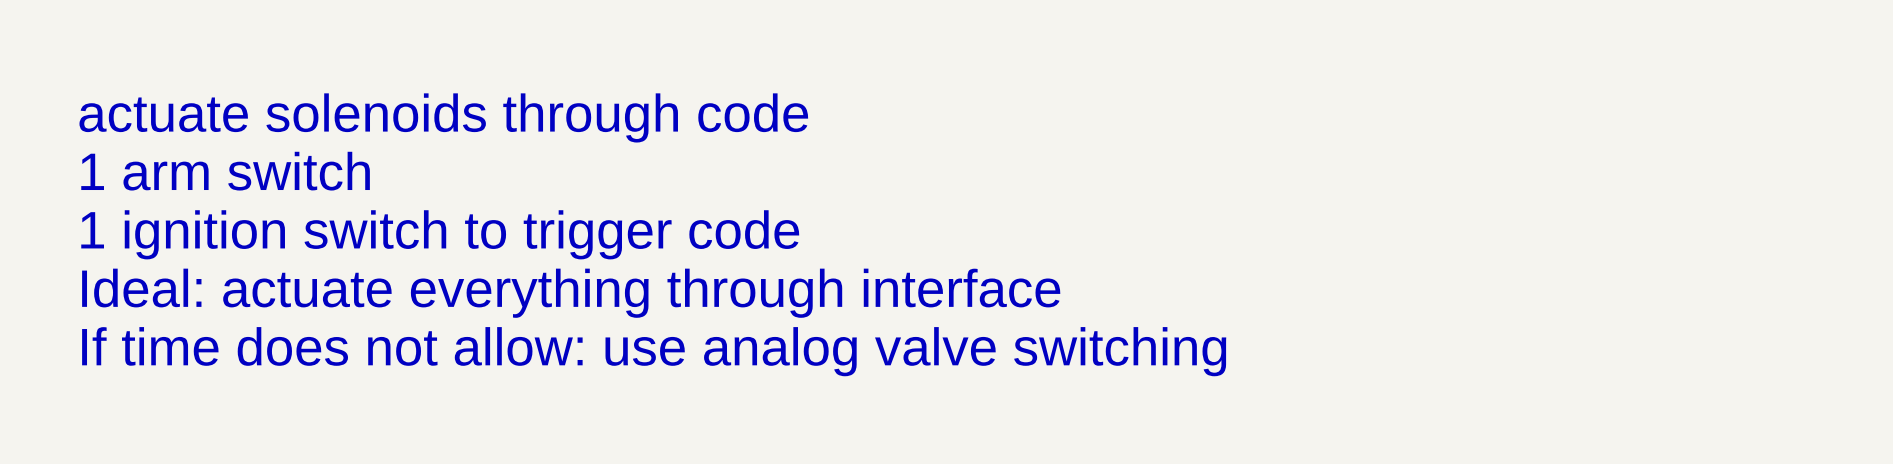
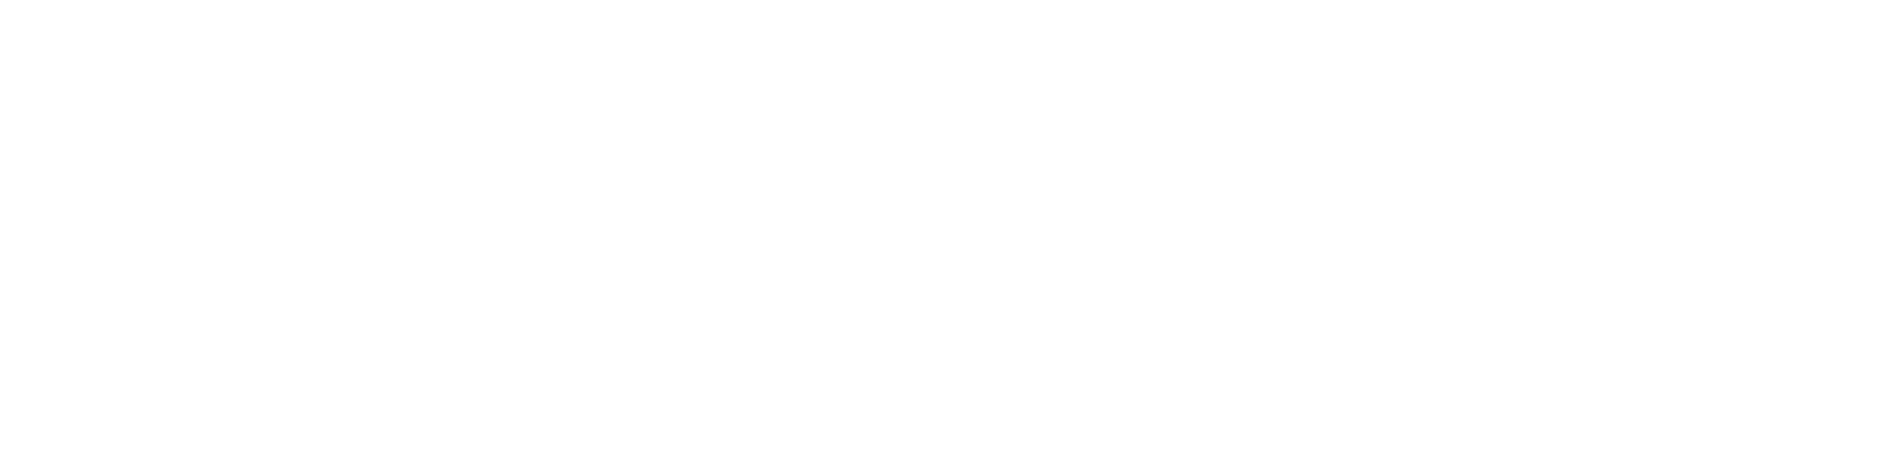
text: actuate solenoids through code (443, 117) -> none
text: 1 arm switch (225, 171) -> none
text: 1 ignition switch to trigger code (440, 234) -> none
text: Ideal: actuate everything through interface (571, 293) -> none
text: If time does not allow: use analog valve switching (654, 351) -> none

